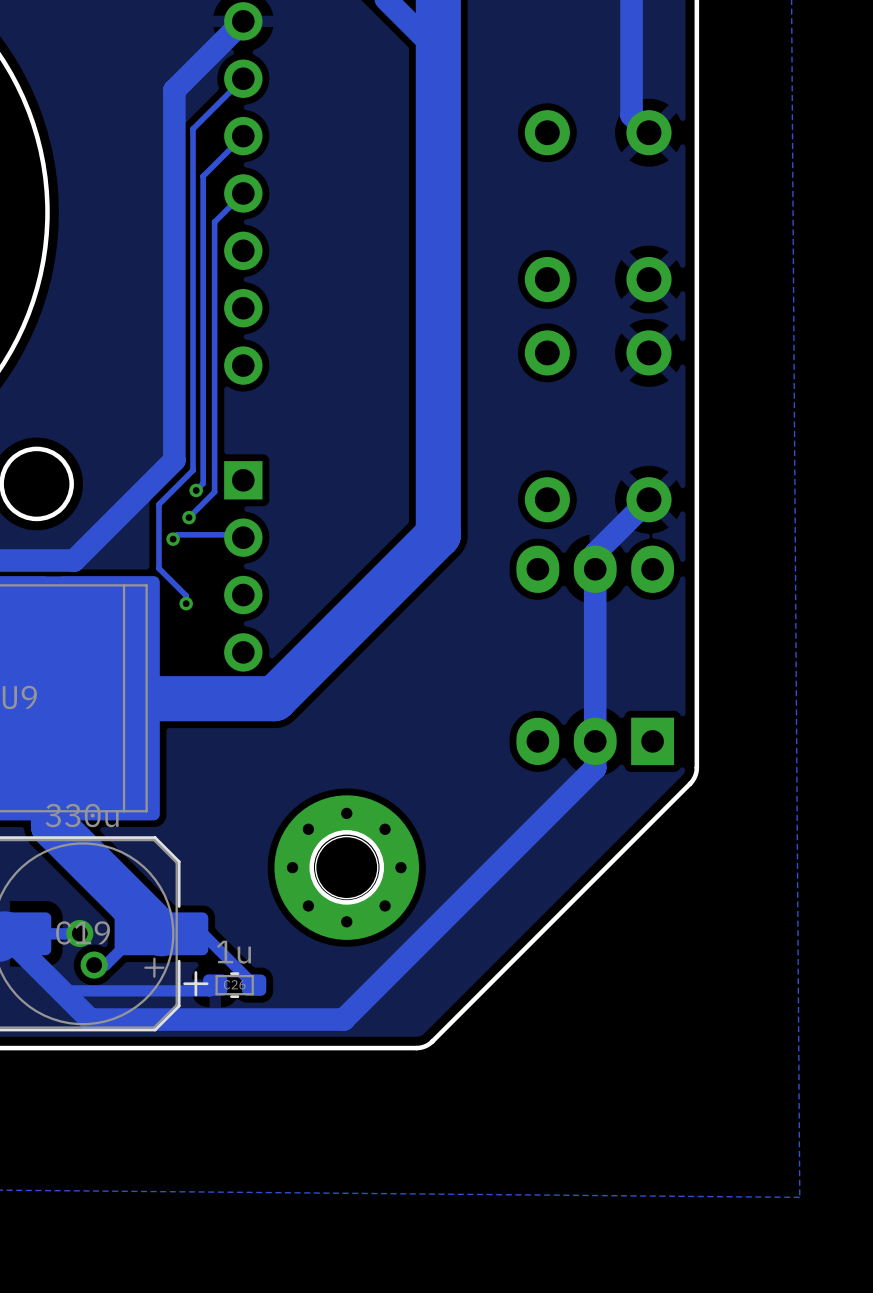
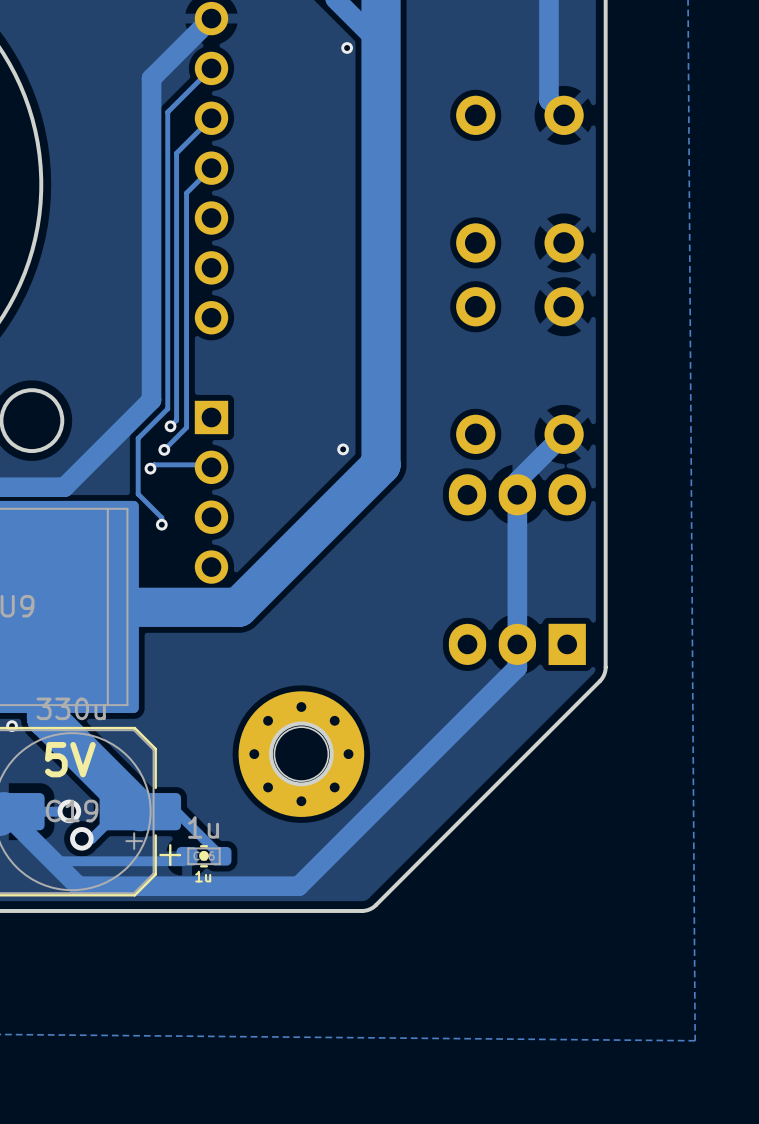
via: none -> (347, 47)
via: none -> (343, 449)
via: none -> (12, 726)
text: none -> 5V (70, 759)
drawing: none -> [199, 850, 209, 861]
text: none -> 1u (203, 876)

